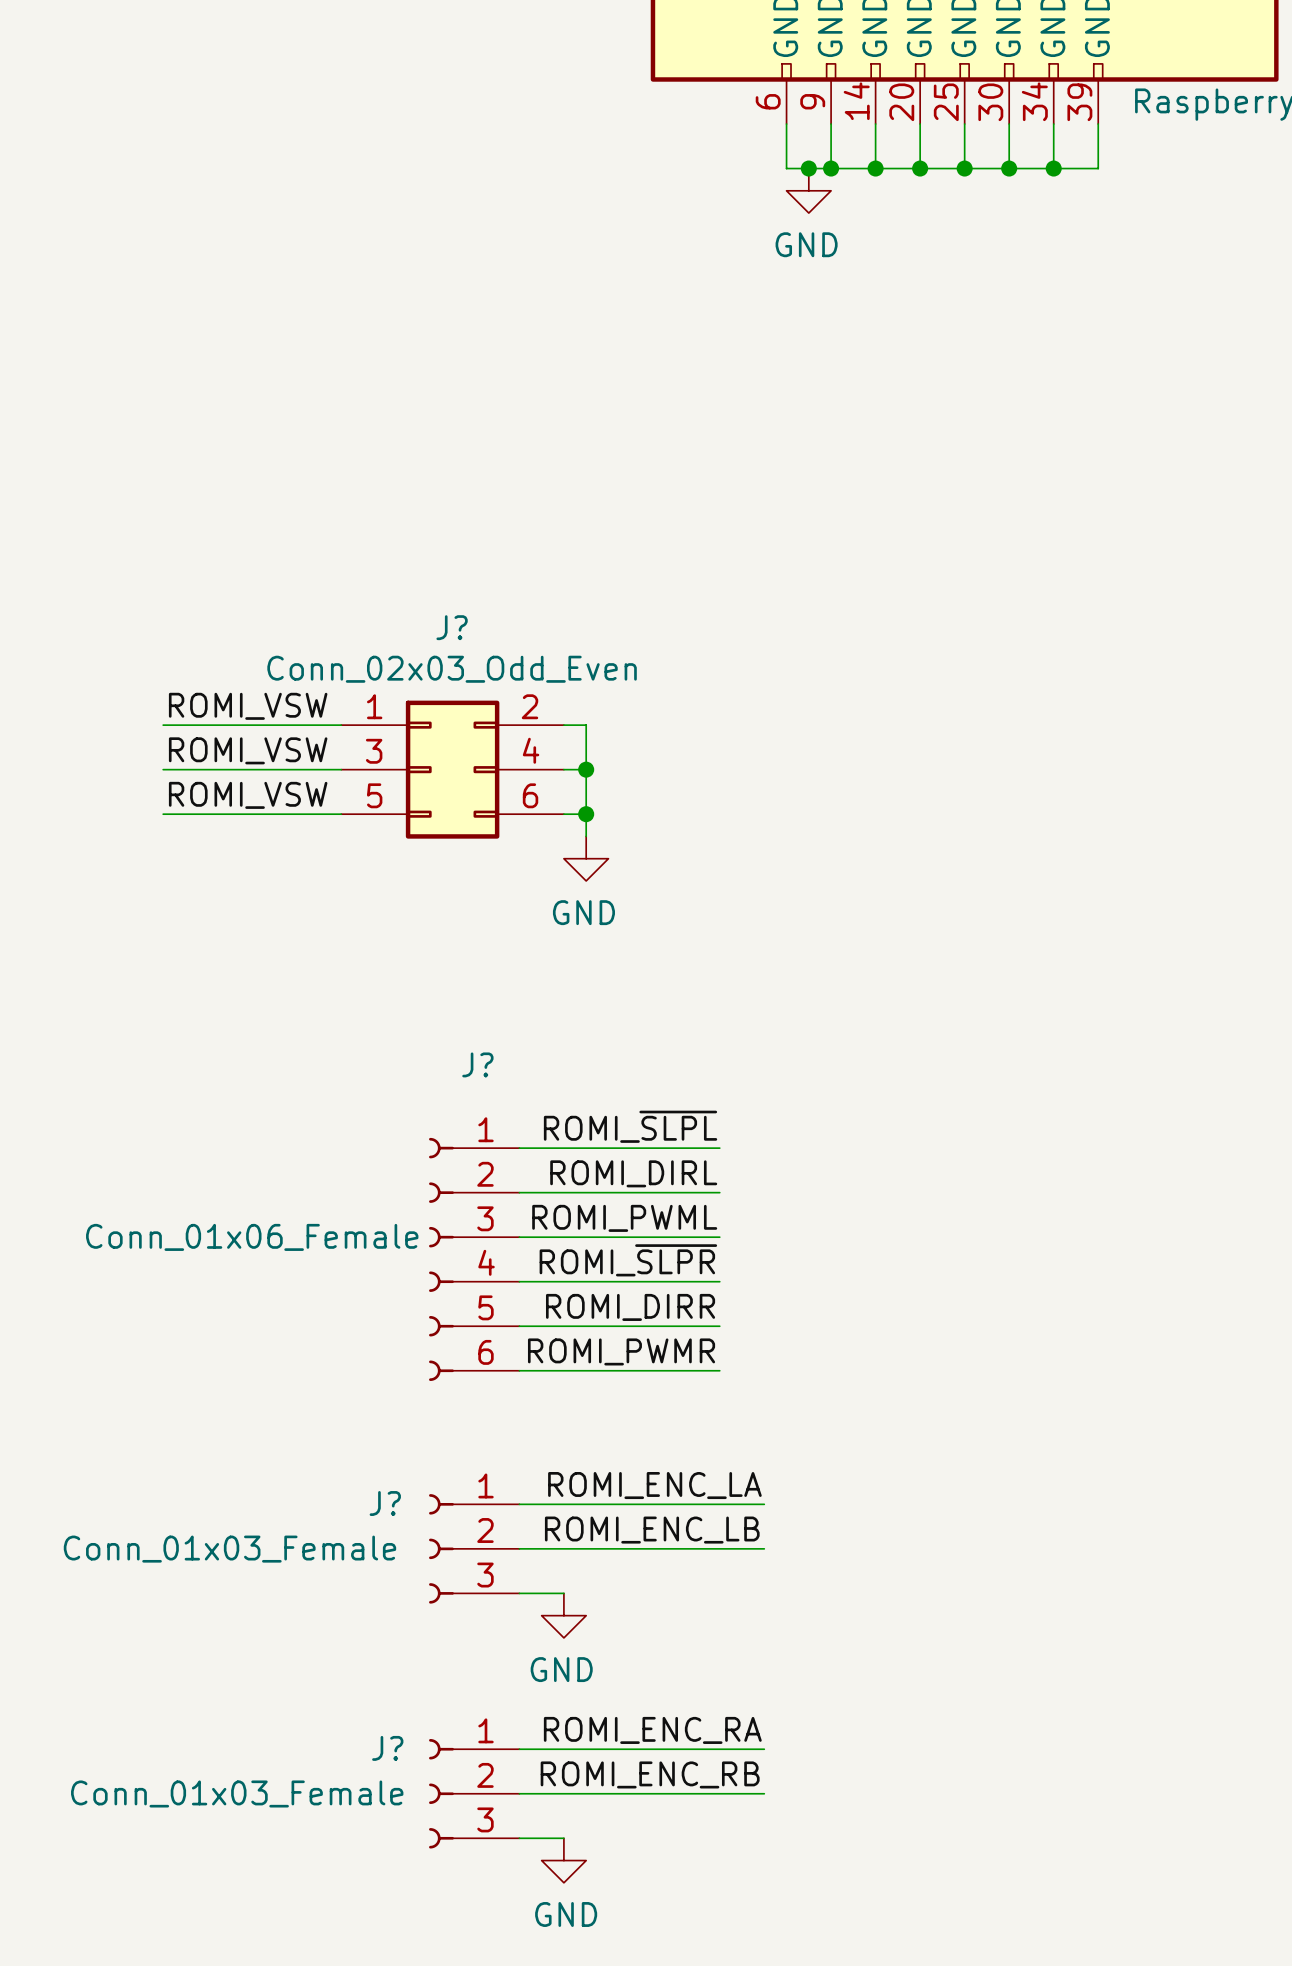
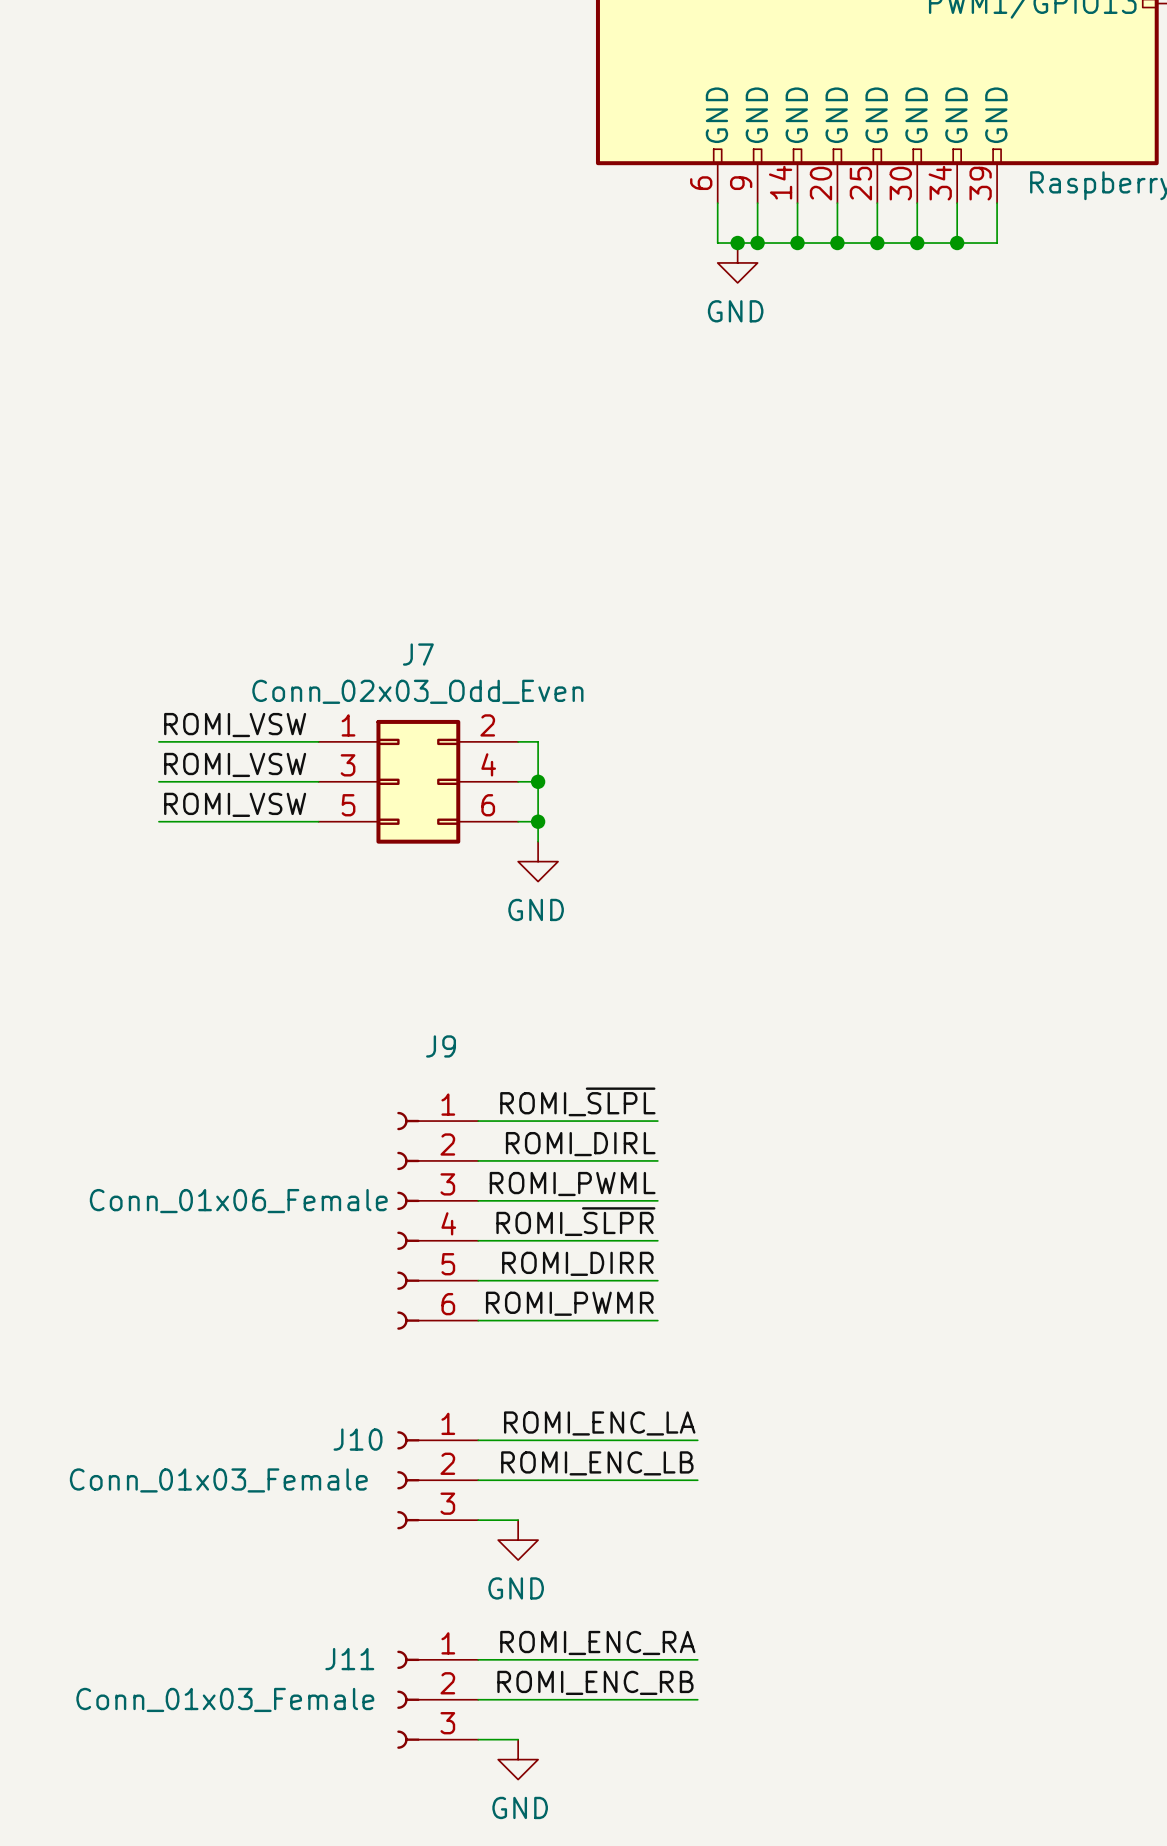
J? name: J? (452, 627) -> J7 (418, 654)
J? name: J? (477, 1064) -> J9 (441, 1046)
J? name: J? (385, 1503) -> J10 (358, 1439)
J? name: J? (387, 1748) -> J11 (349, 1659)

